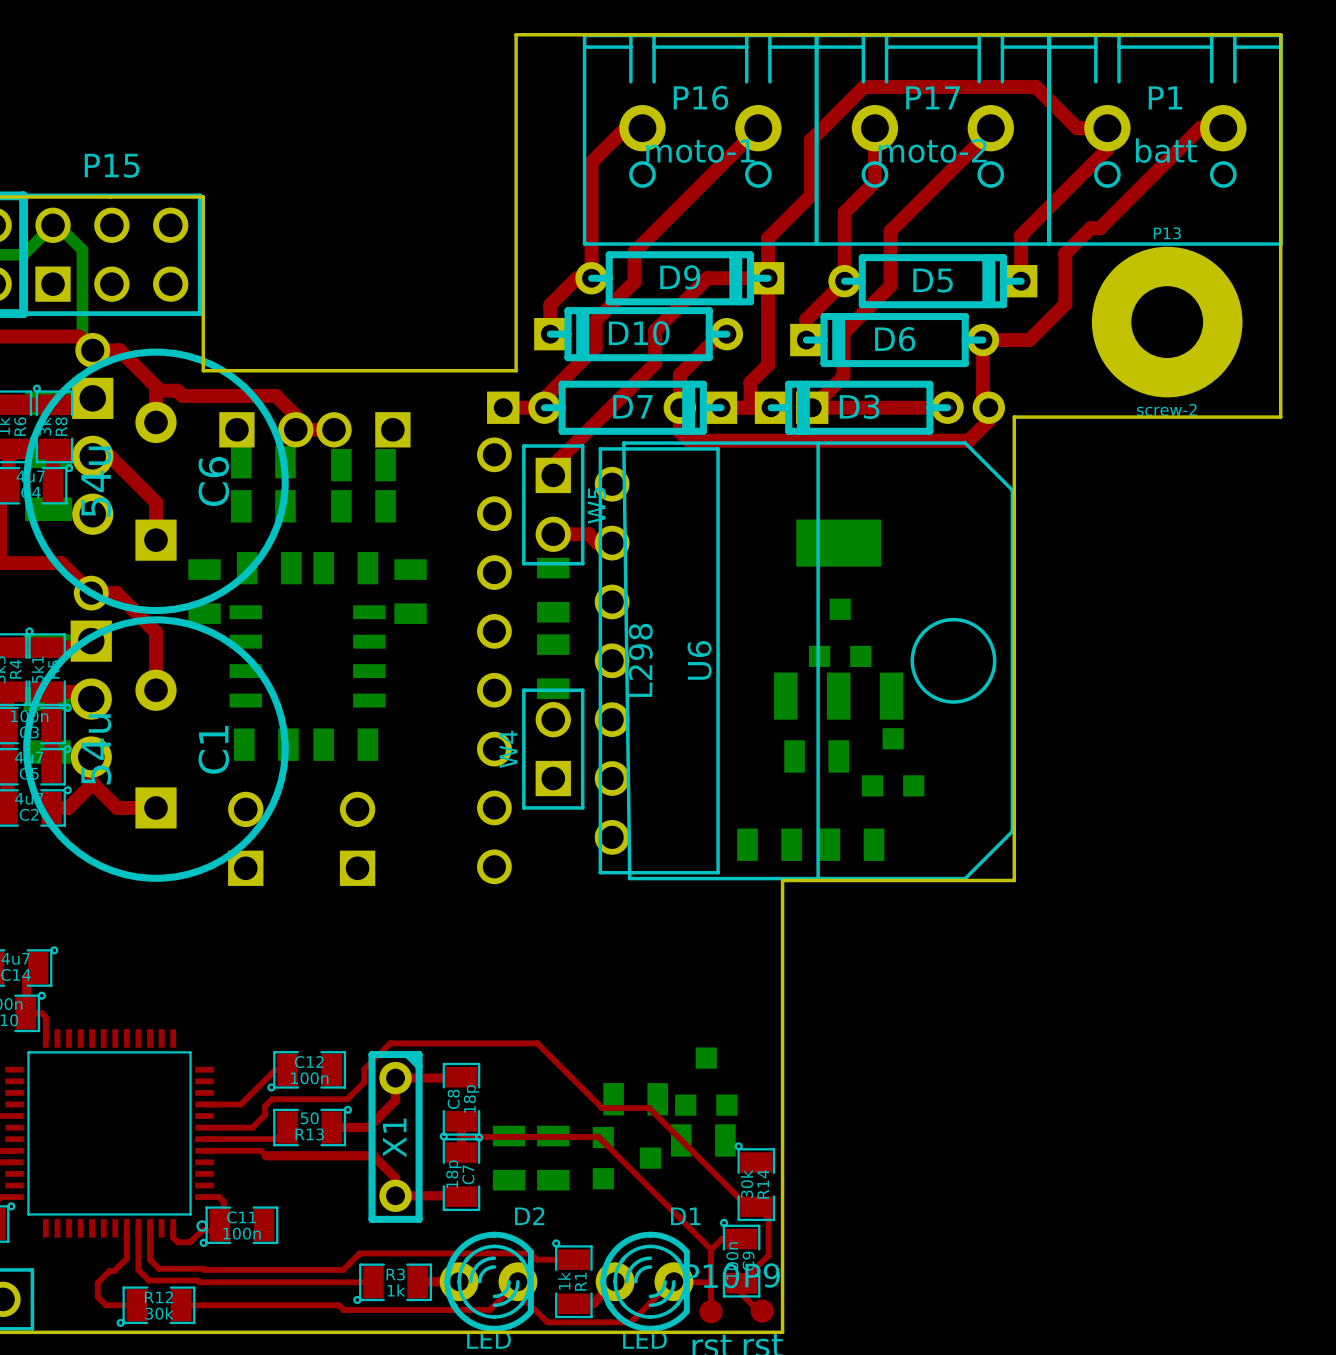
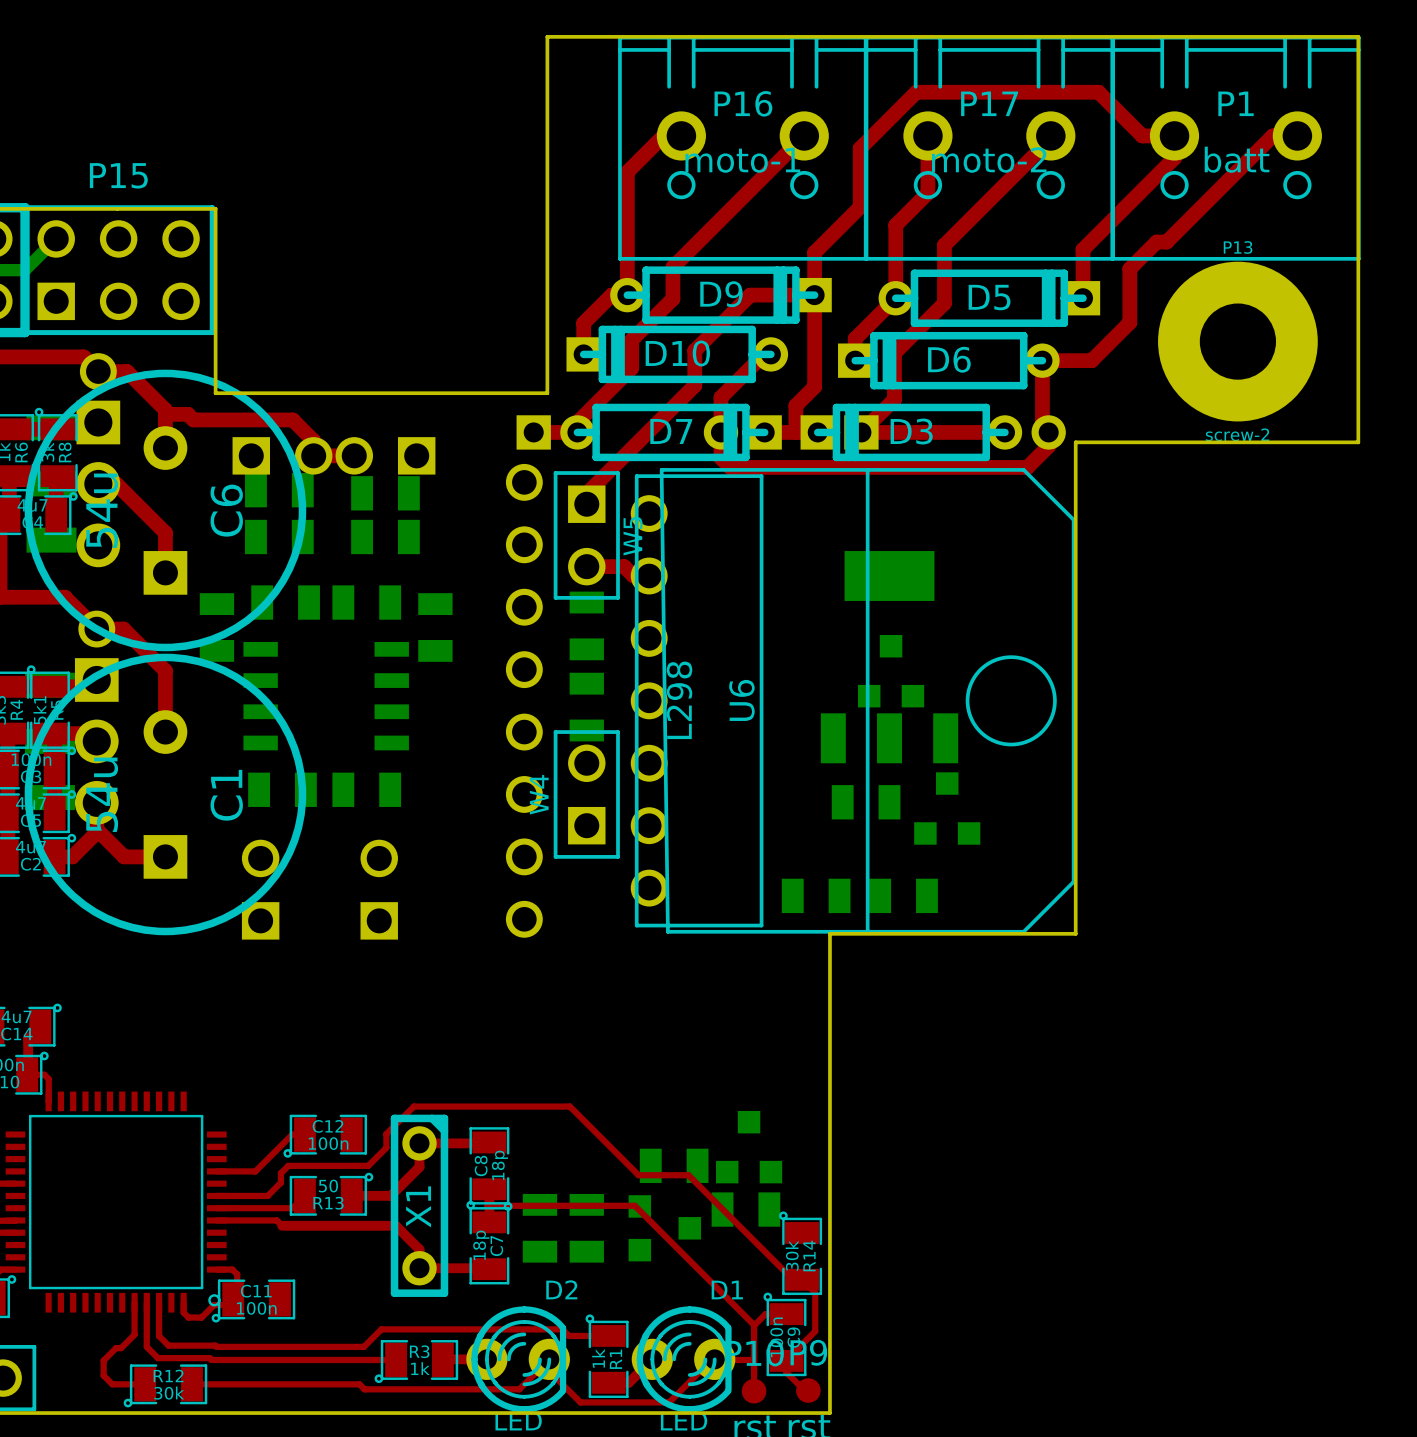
bottom track: (53, 225) (57, 225) (82, 250) (82, 340) (92, 350) -> none

